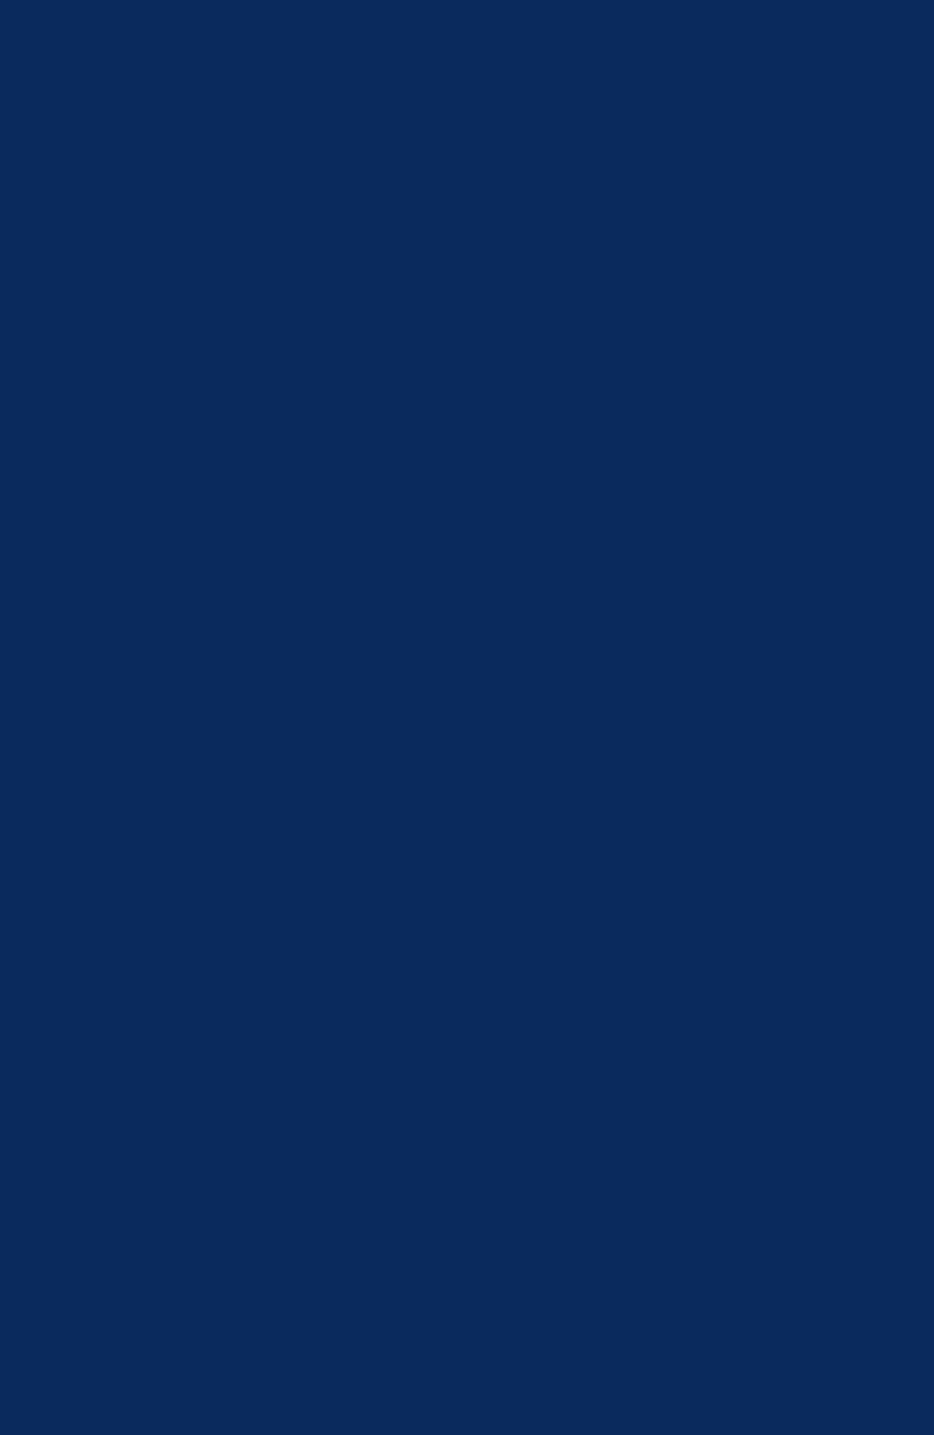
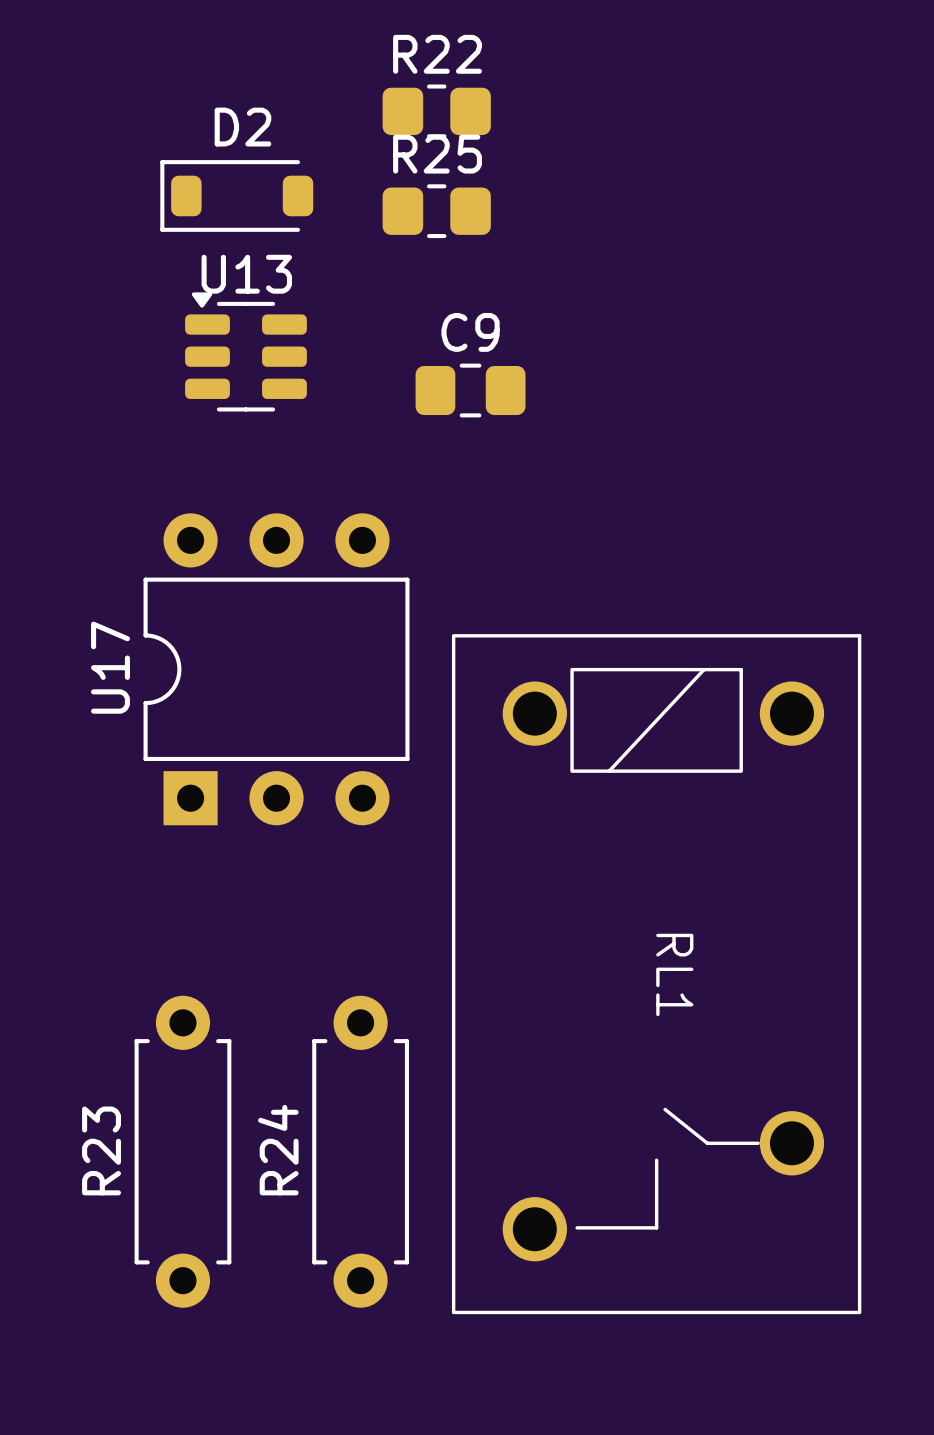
R22: none -> (436, 111)
D2: none -> (236, 195)
R25: none -> (436, 211)
U13: none -> (245, 351)
C9: none -> (470, 390)
U17: none -> (276, 669)
RL1: none -> (656, 974)
R23: none -> (182, 1151)
R24: none -> (360, 1151)

